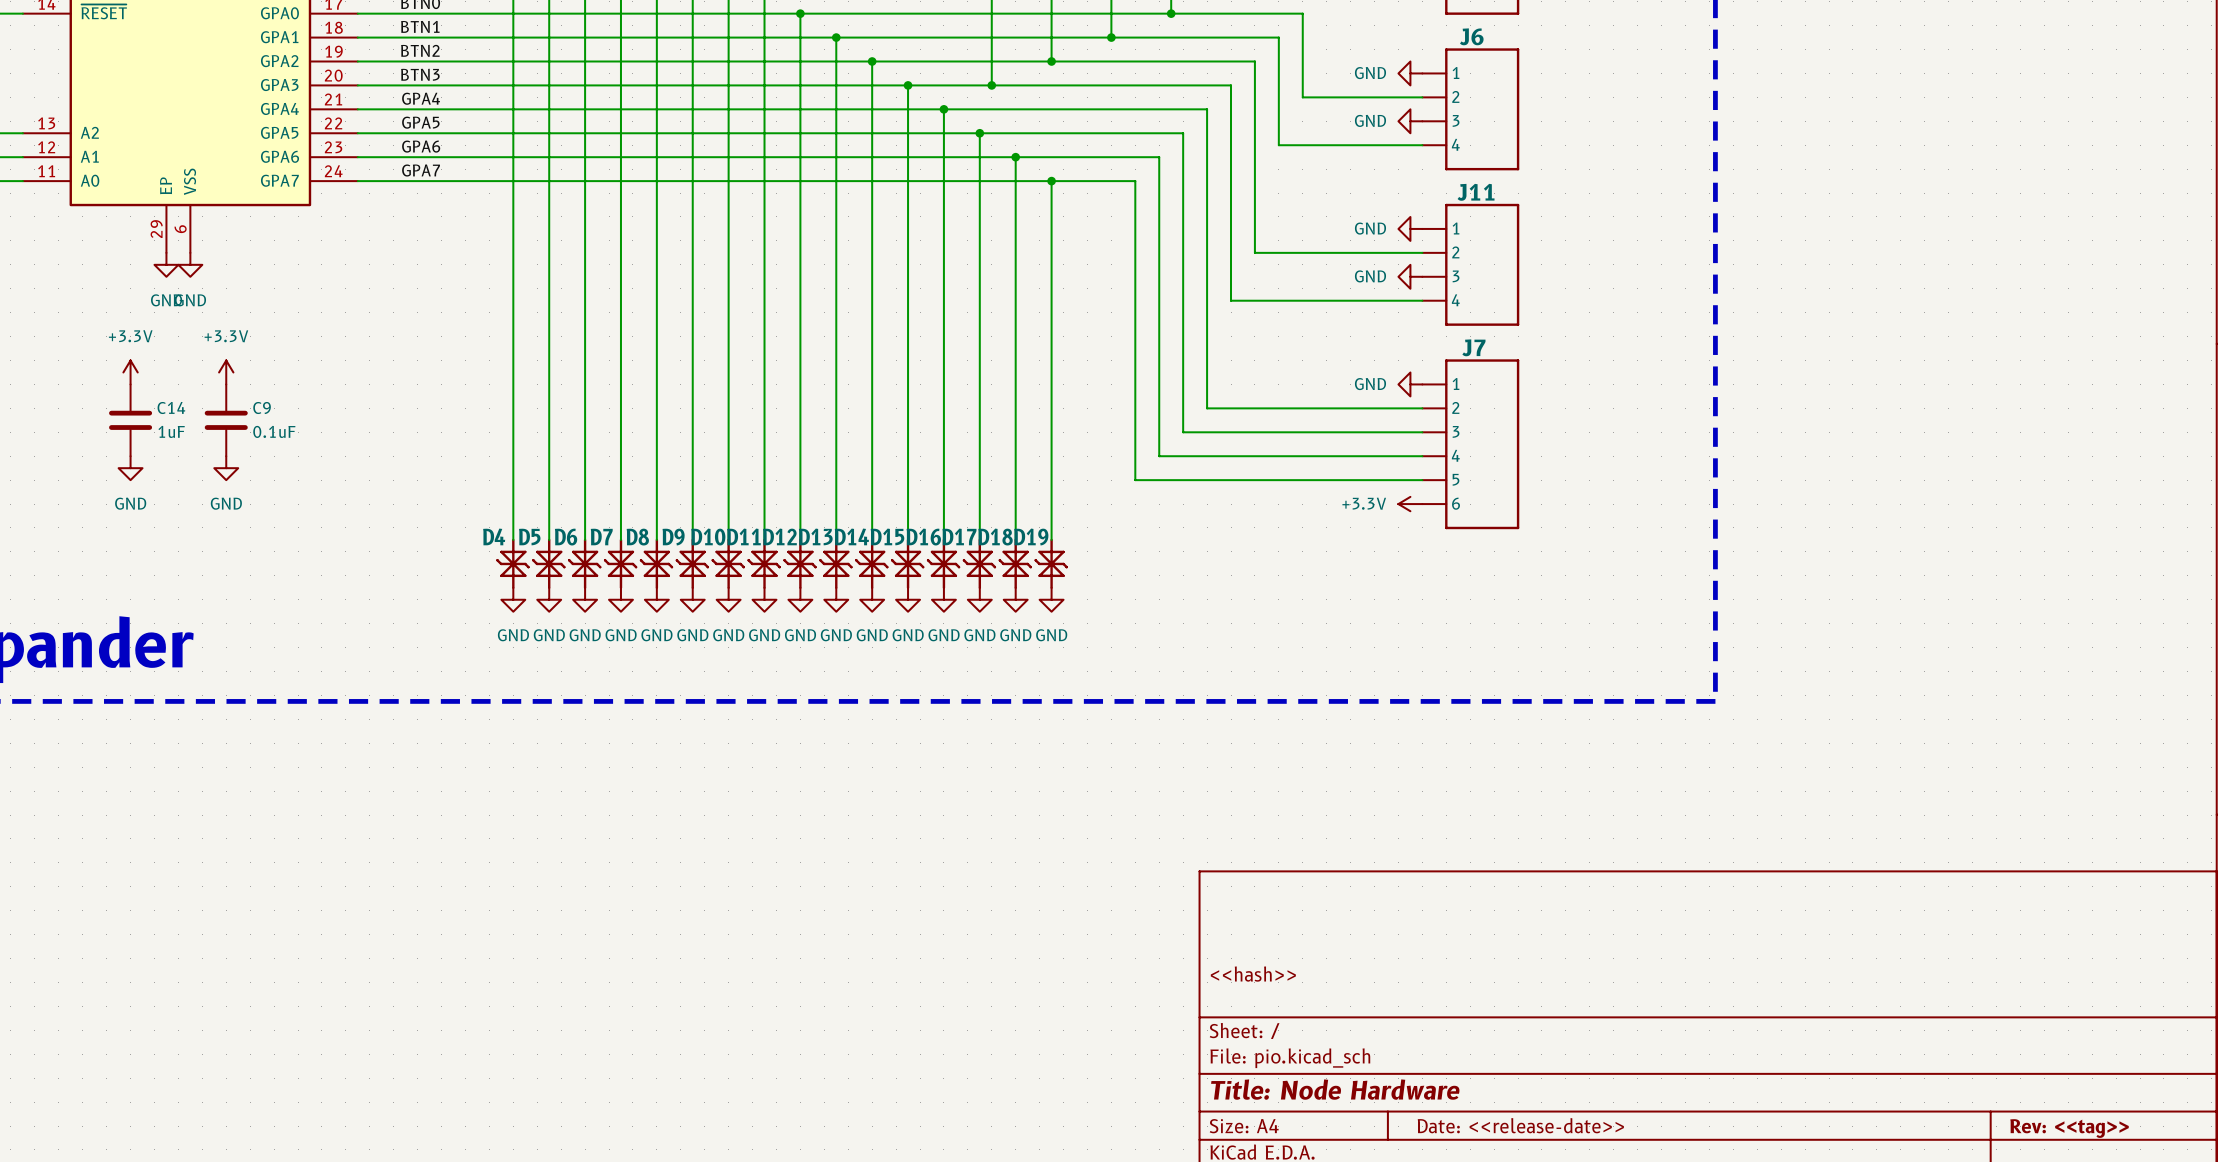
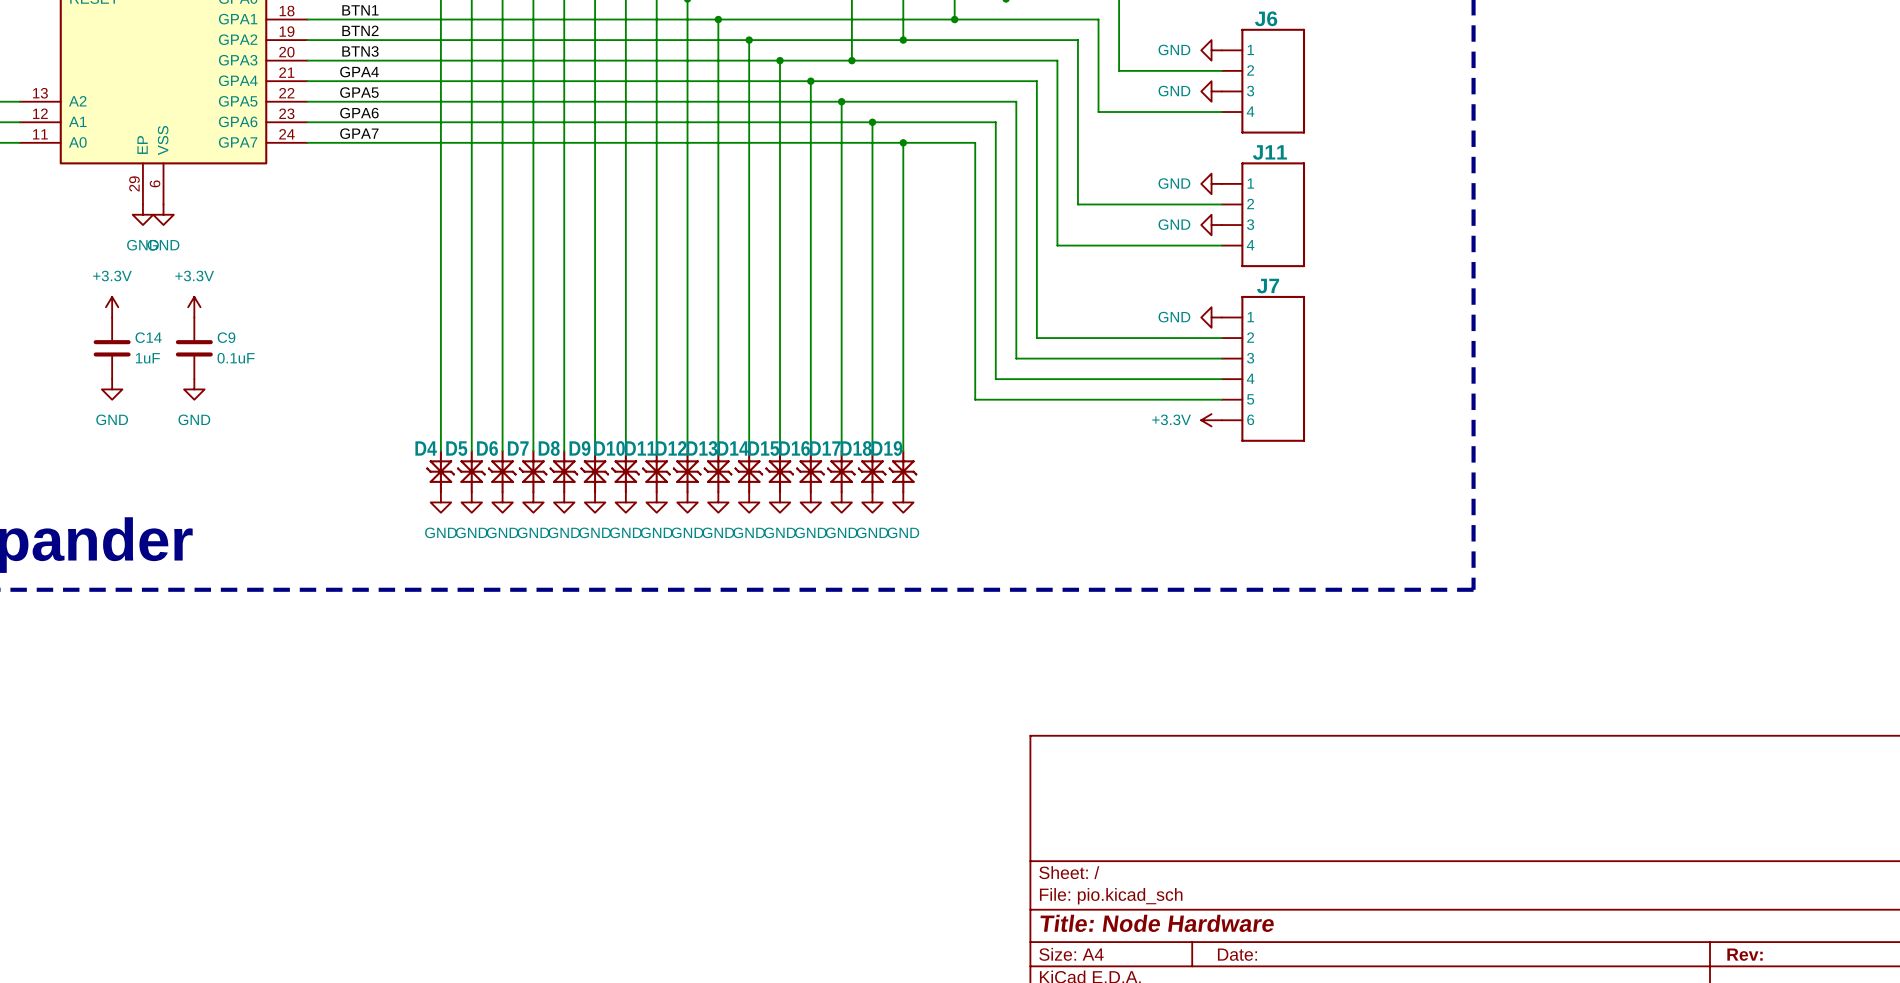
title block: <<hash>> (1253, 974) -> none
title block: Date: <<release-date>> (1520, 1125) -> Date: (1237, 954)
title block: Rev: <<tag>> (2069, 1128) -> Rev: (1745, 954)

